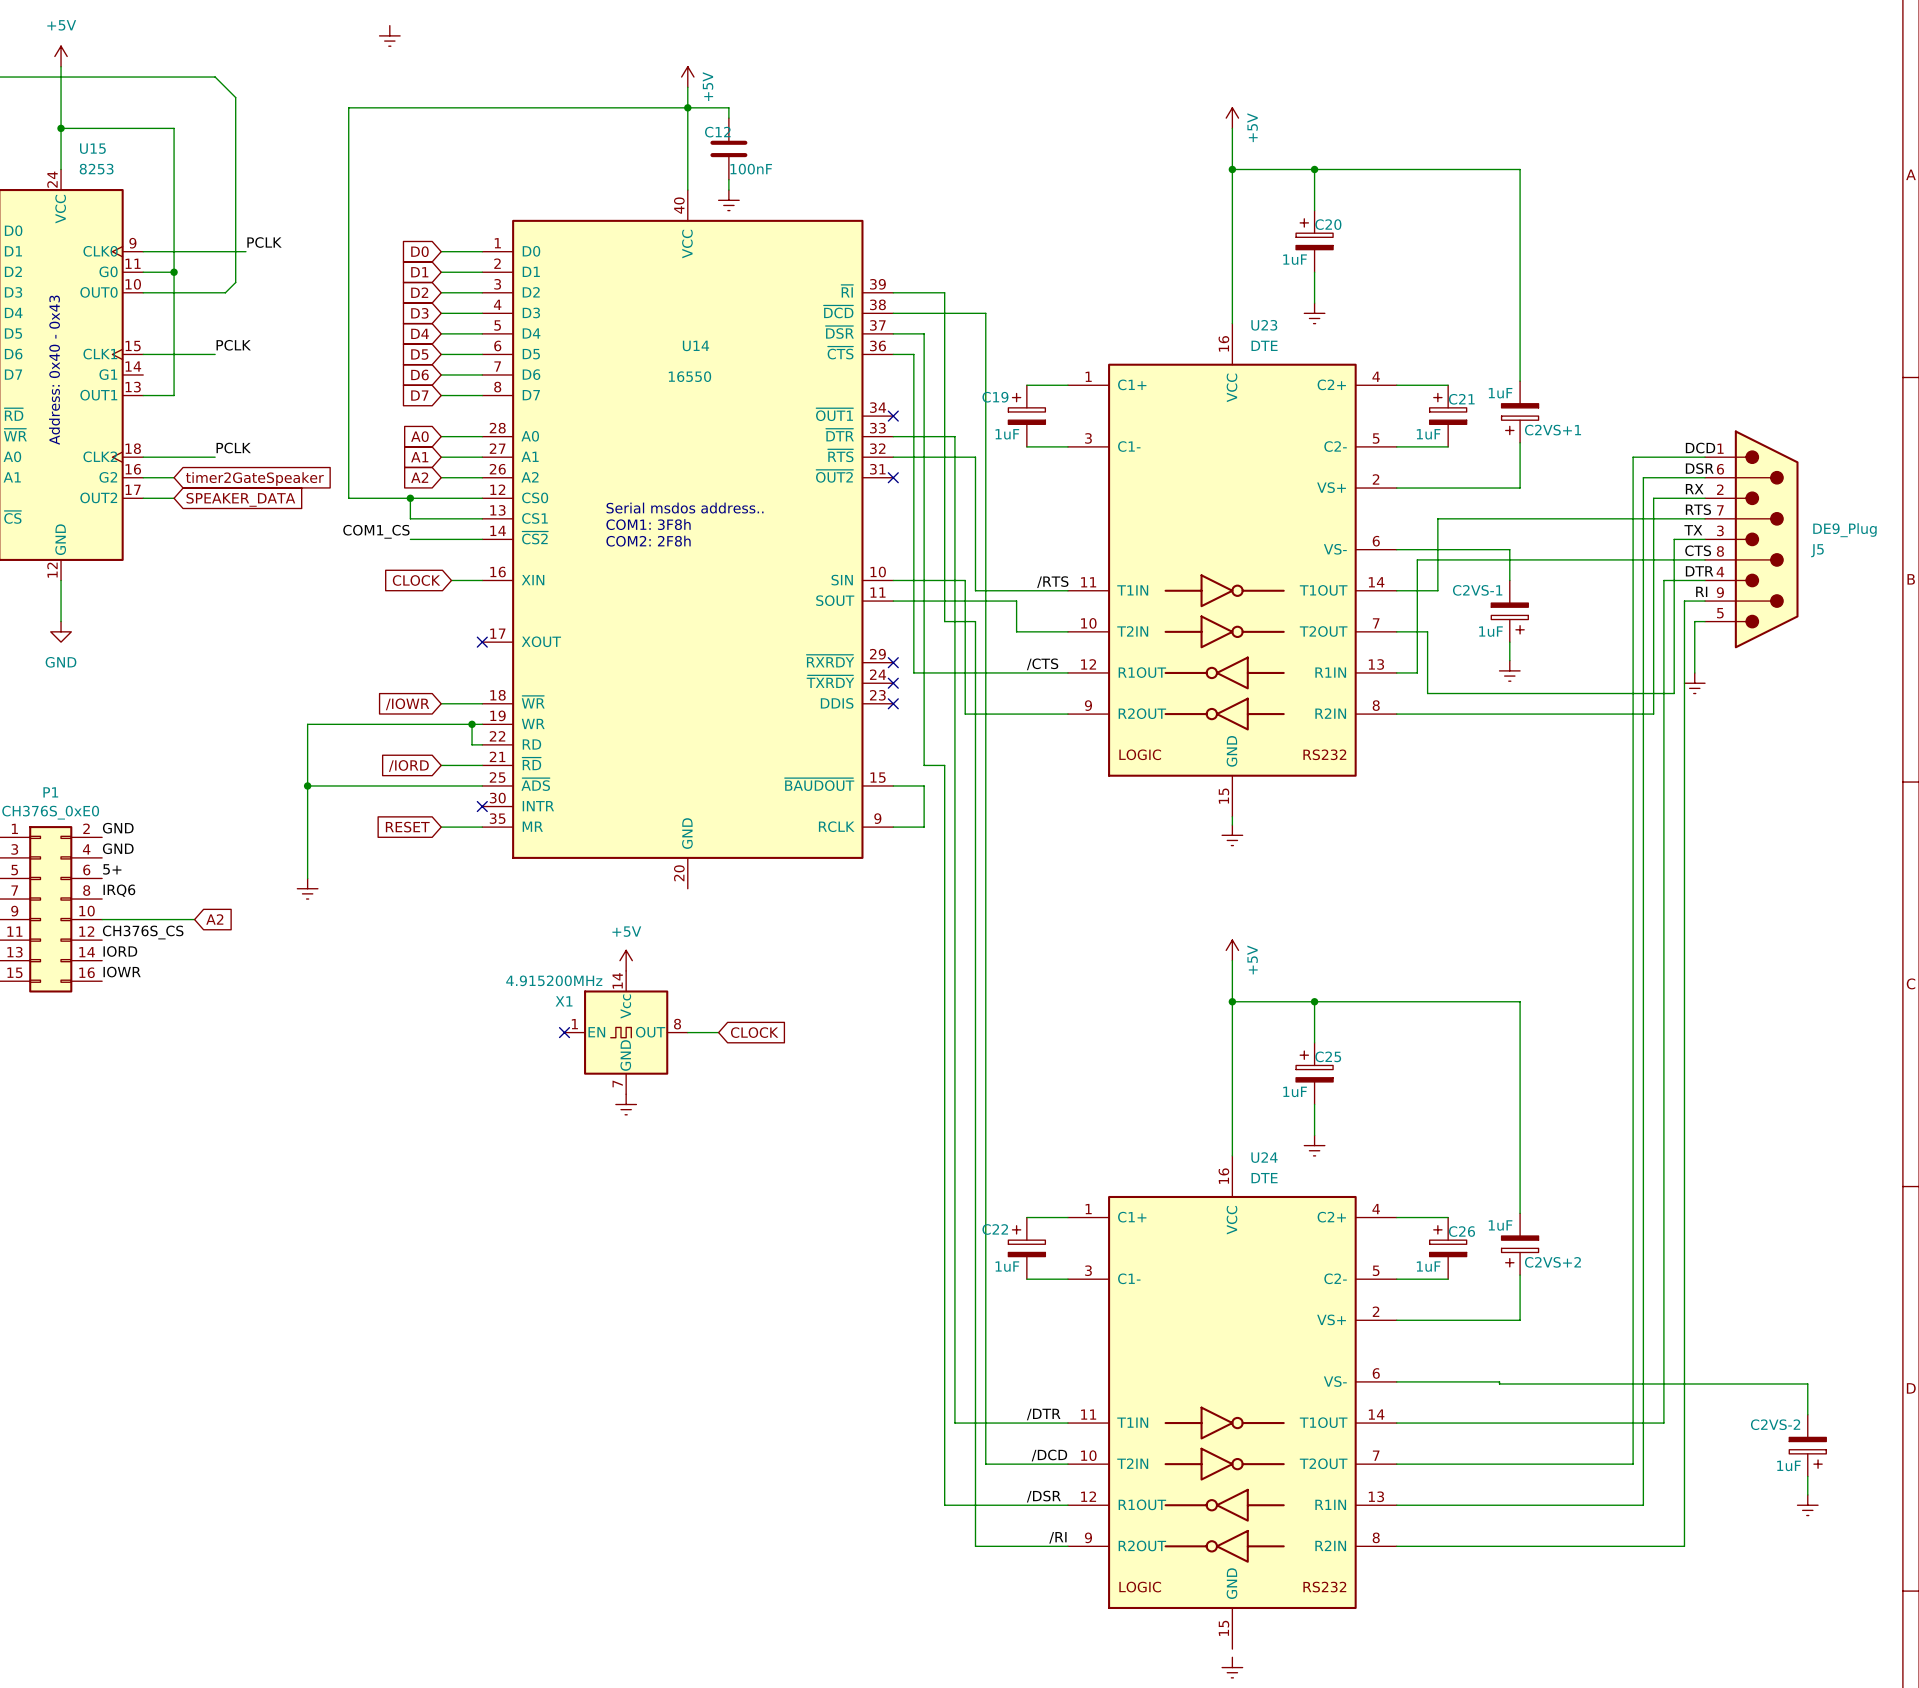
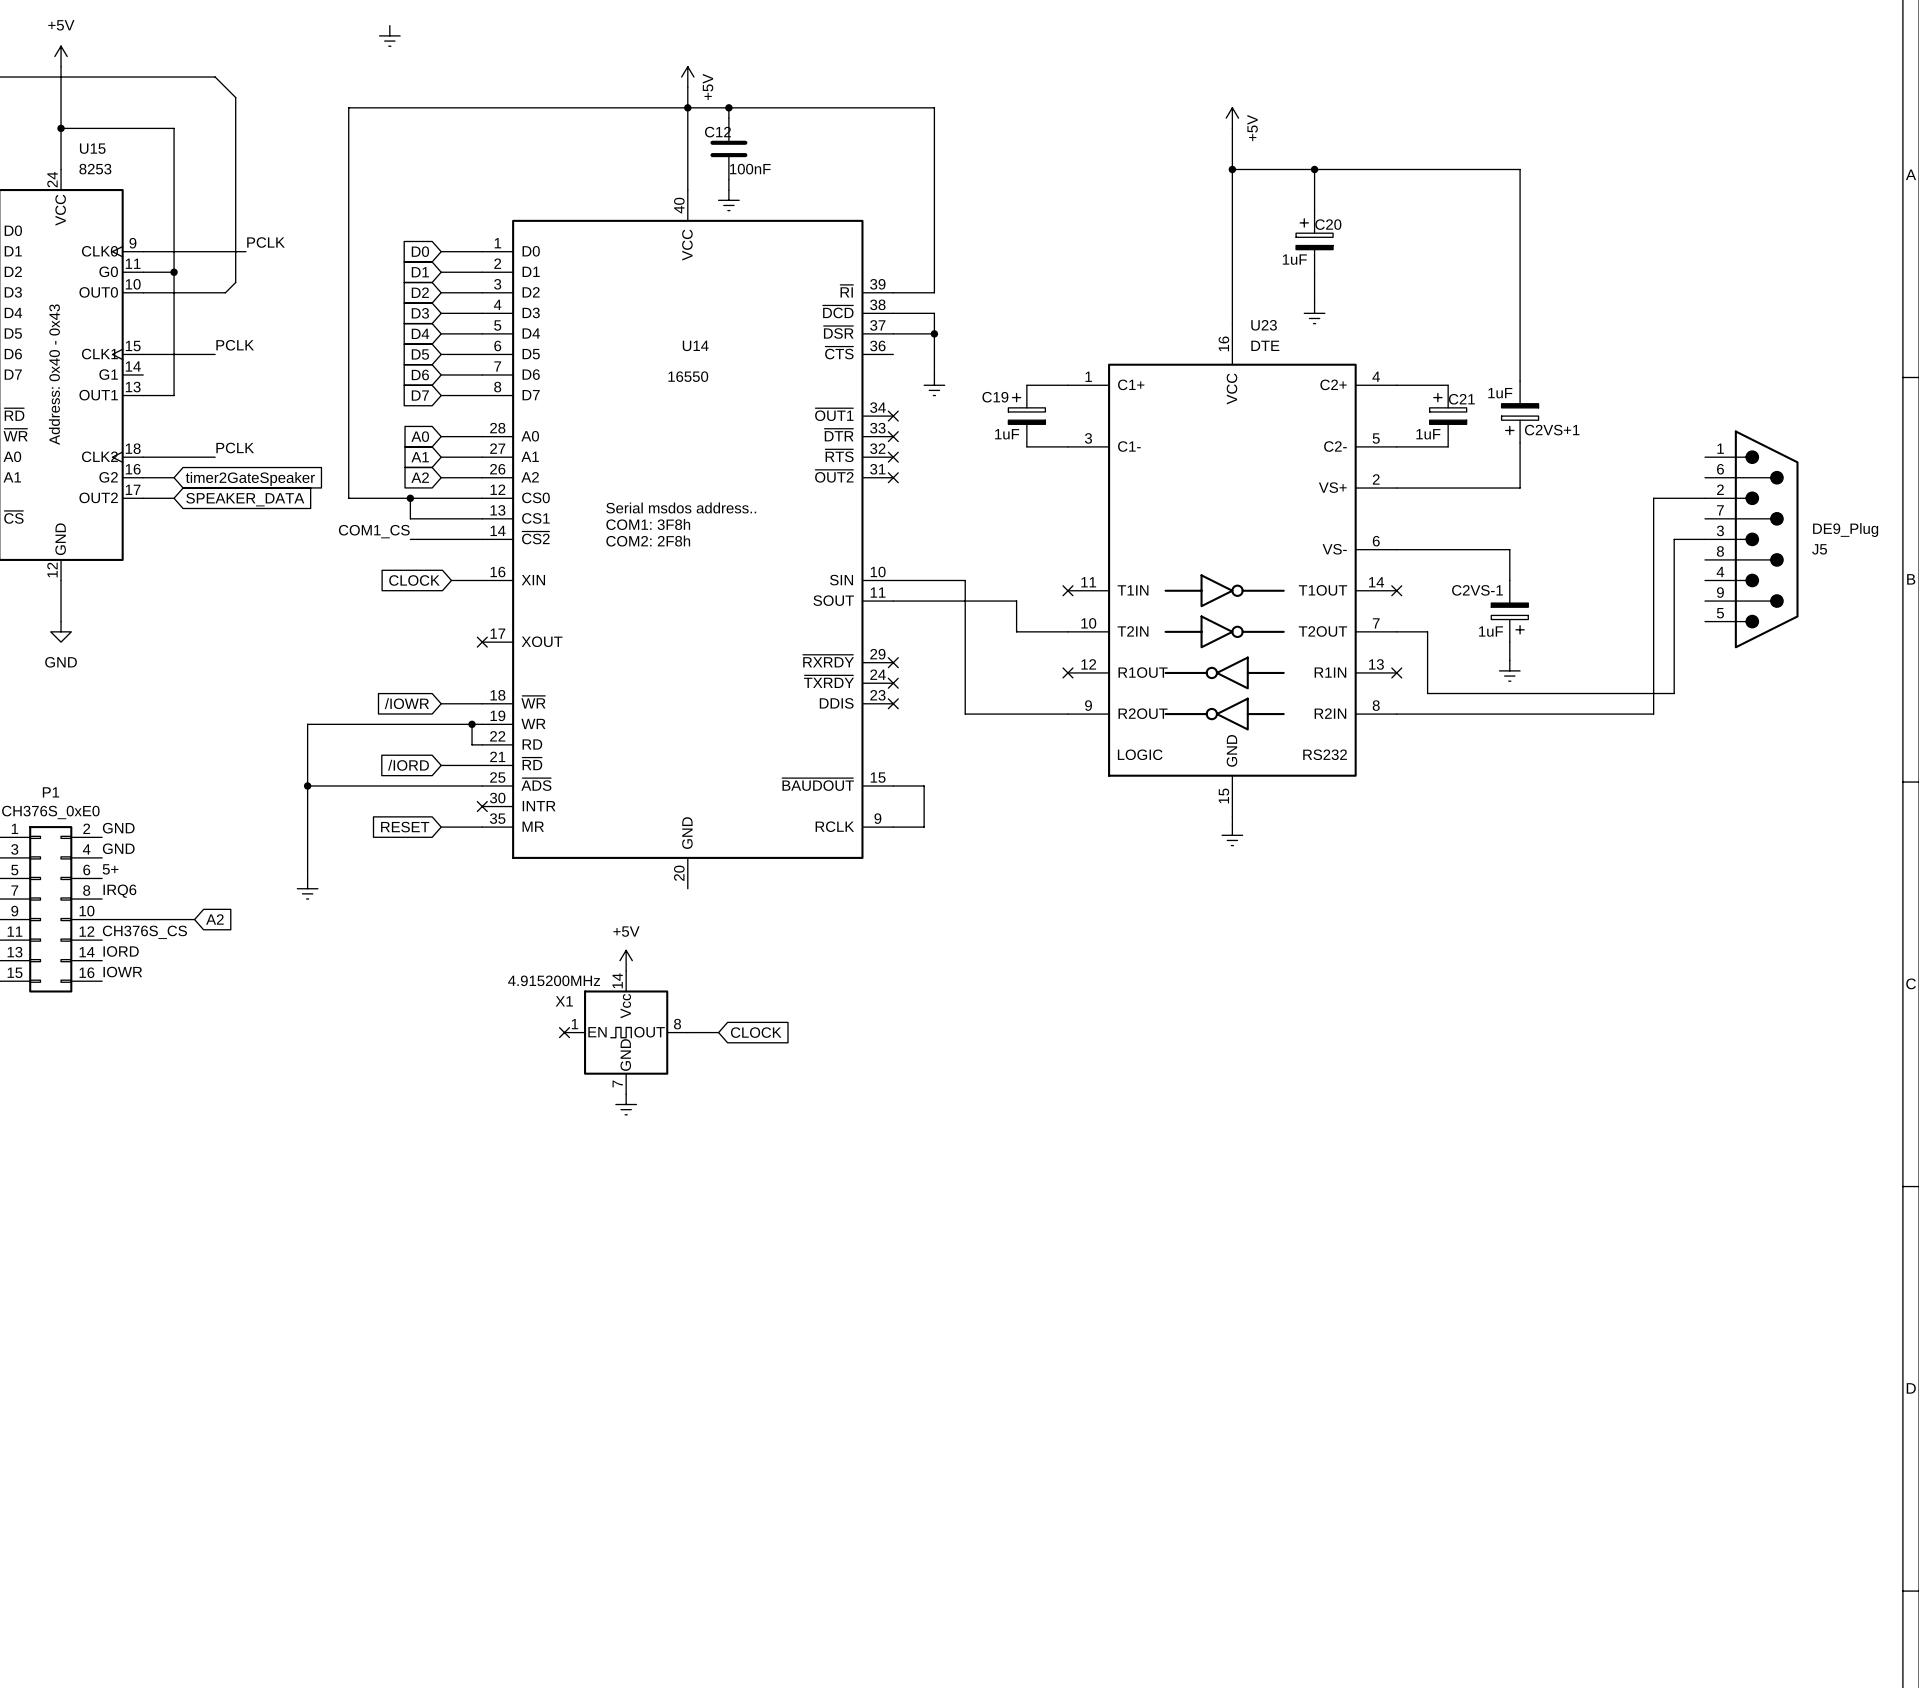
junction: none -> (728, 107)
wire: (934, 292) (944, 292) (944, 621) (975, 621) (975, 1546) (1067, 1546) -> (934, 292) (934, 107) (728, 107)
wire: (934, 313) (985, 313) (985, 1464) (1067, 1464) -> (934, 313) (934, 374)
wire: (924, 333) (924, 765) (944, 765) (944, 1505) (1067, 1505) -> (924, 333) (934, 333)
junction: none -> (934, 333)
wire: (893, 354) (913, 354) (913, 672) (1067, 672) -> none
power symbol: none -> (934, 385)
wire: (893, 436) (954, 436) (954, 1423) (1067, 1423) -> none
no-connect mark: none -> (893, 436)
label: DCD (1700, 448) -> none
wire: (893, 457) (975, 457) (975, 590) (1067, 590) -> none
no-connect mark: none -> (893, 457)
wire: (1705, 457) (1633, 457) (1633, 1464) (1396, 1464) -> none
label: DSR (1699, 468) -> none
wire: (1705, 477) (1643, 477) (1643, 1505) (1396, 1505) -> none
label: RX (1694, 489) -> none
label: RTS (1698, 509) -> none
wire: (1705, 518) (1437, 518) (1437, 590) (1396, 590) -> none
label: TX (1693, 530) -> none
label: CTS (1698, 550) -> none
wire: (1705, 559) (1417, 559) (1417, 672) (1396, 672) -> none
label: DTR (1699, 571) -> none
wire: (1705, 580) (1663, 580) (1663, 1423) (1396, 1423) -> none
label: /RTS (1052, 582) -> none
no-connect mark: none -> (1067, 590)
no-connect mark: none -> (1396, 590)
label: RI (1701, 591) -> none
wire: (1705, 601) (1684, 601) (1684, 1546) (1396, 1546) -> none
wire: (1705, 621) (1694, 621) (1694, 672) -> none
label: /CTS (1042, 664) -> none
no-connect mark: none -> (1067, 672)
no-connect mark: none -> (1396, 672)
power symbol: (1694, 683) -> none
power symbol: +5V (1232, 950) -> none
wire: (1232, 960) (1232, 1155) -> none
wire: (1232, 1001) (1520, 1001) (1520, 1213) -> none
junction: (1232, 1001) -> none
wire: (1314, 1001) (1314, 1042) -> none
junction: (1314, 1001) -> none
C25: 1uF (1314, 1073) -> none
wire: (1314, 1104) (1314, 1135) -> none
power symbol: (1314, 1145) -> none
wire: (1026, 1217) (1067, 1217) -> none
wire: (1396, 1217) (1448, 1217) -> none
C2VS+2: 1uF (1520, 1244) -> none
C22: 1uF (1026, 1248) -> none
C26: 1uF (1448, 1248) -> none
wire: (1520, 1275) (1520, 1320) (1396, 1320) -> none
wire: (1026, 1279) (1067, 1279) -> none
wire: (1396, 1279) (1448, 1279) -> none
wire: (1396, 1381) (1499, 1381) (1499, 1383) (1807, 1383) (1807, 1414) -> none
U24: DTE (1232, 1402) -> none
label: /DTR (1043, 1414) -> none
C2VS-2: 1uF (1807, 1445) -> none
label: /DCD (1049, 1455) -> none
wire: (1807, 1476) (1807, 1494) -> none
label: /DSR (1043, 1496) -> none
power symbol: (1807, 1505) -> none
label: /RI (1057, 1537) -> none
power symbol: (1232, 1667) -> none

